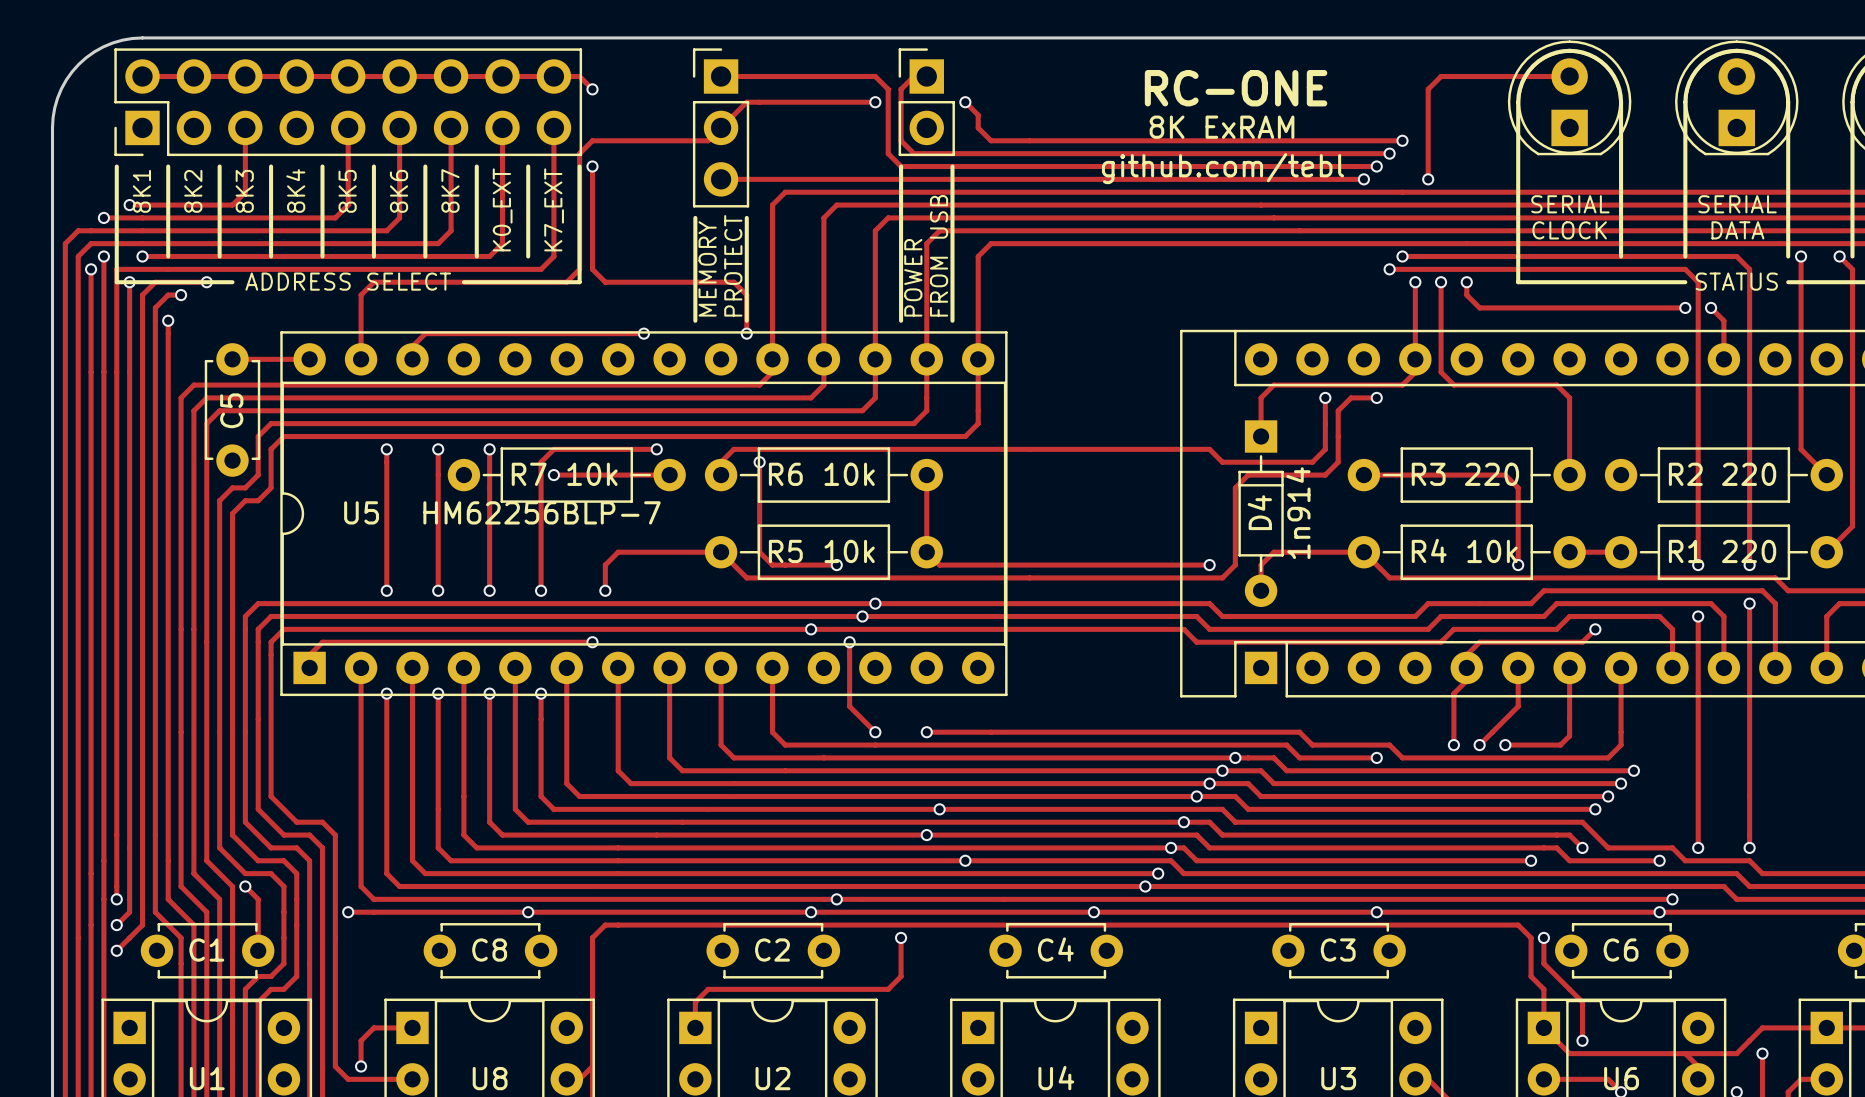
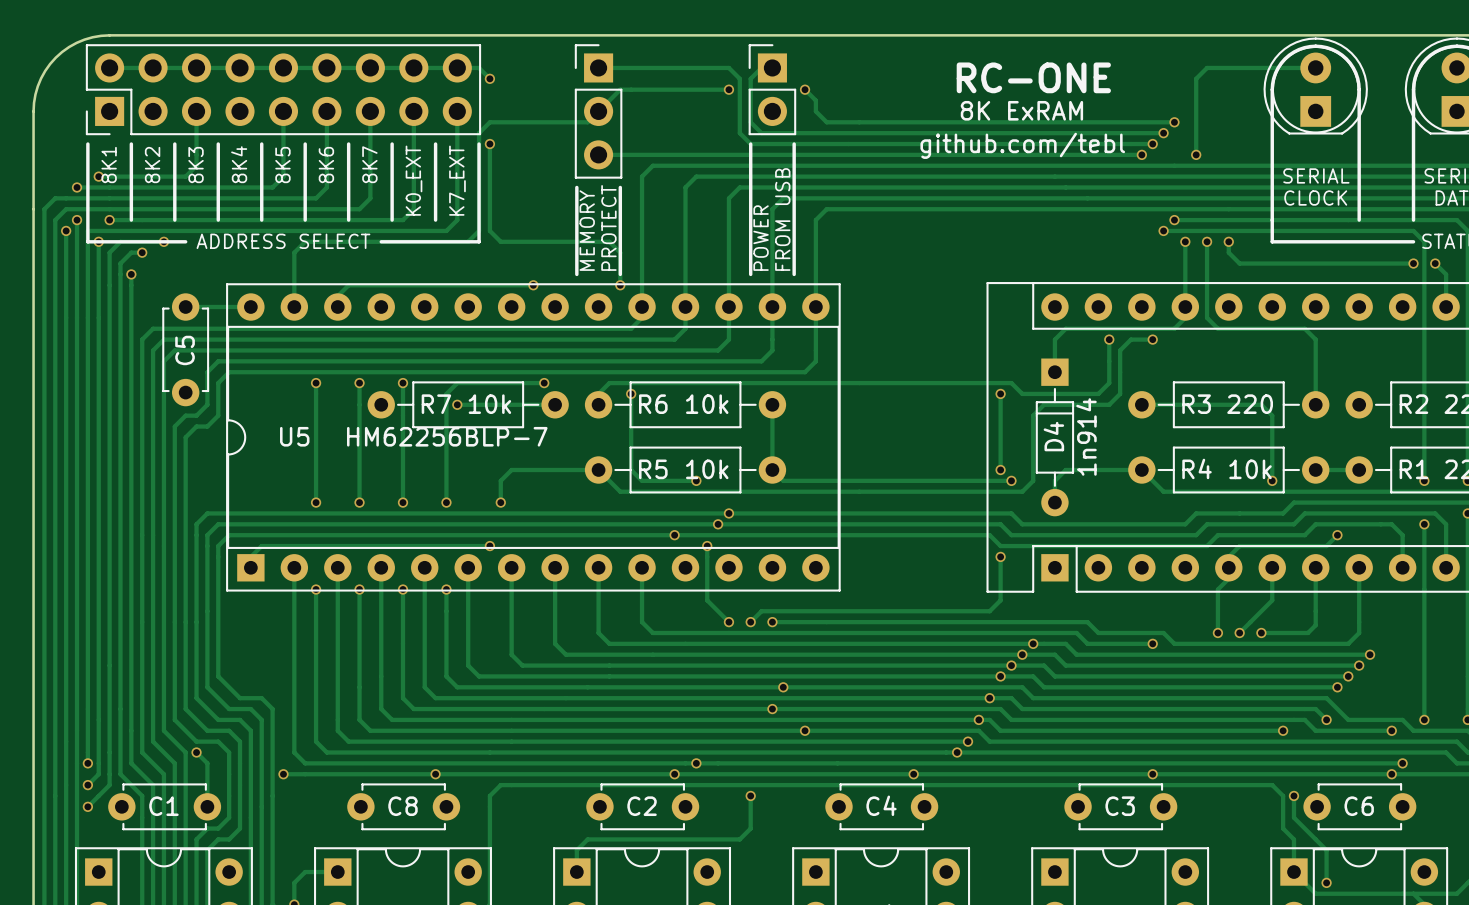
track: none -> (1000, 393) (1000, 469)
via: none -> (1000, 393)
via: none -> (1000, 469)
track: none -> (1000, 556) (1000, 600) (989, 611) (761, 611) (750, 622)
via: none -> (1000, 556)
via: none -> (750, 622)

